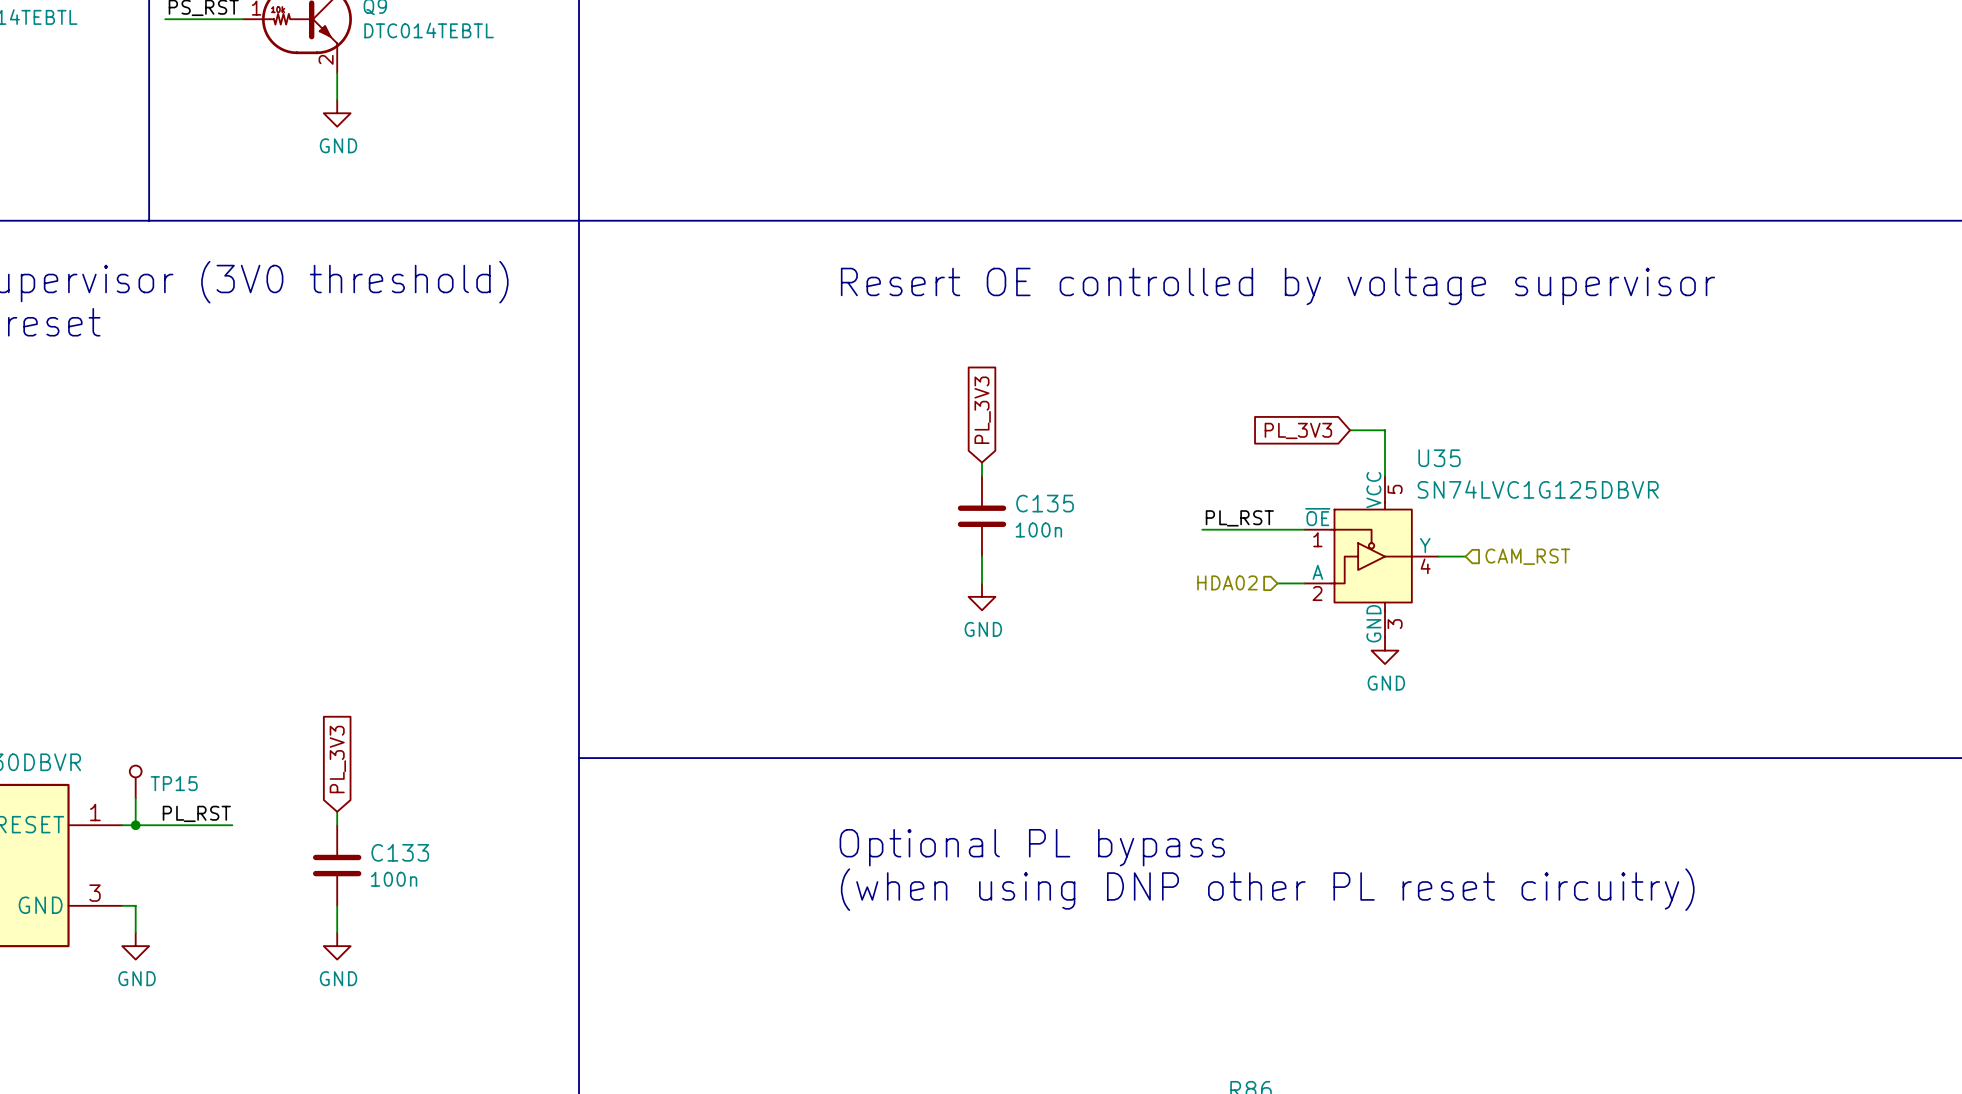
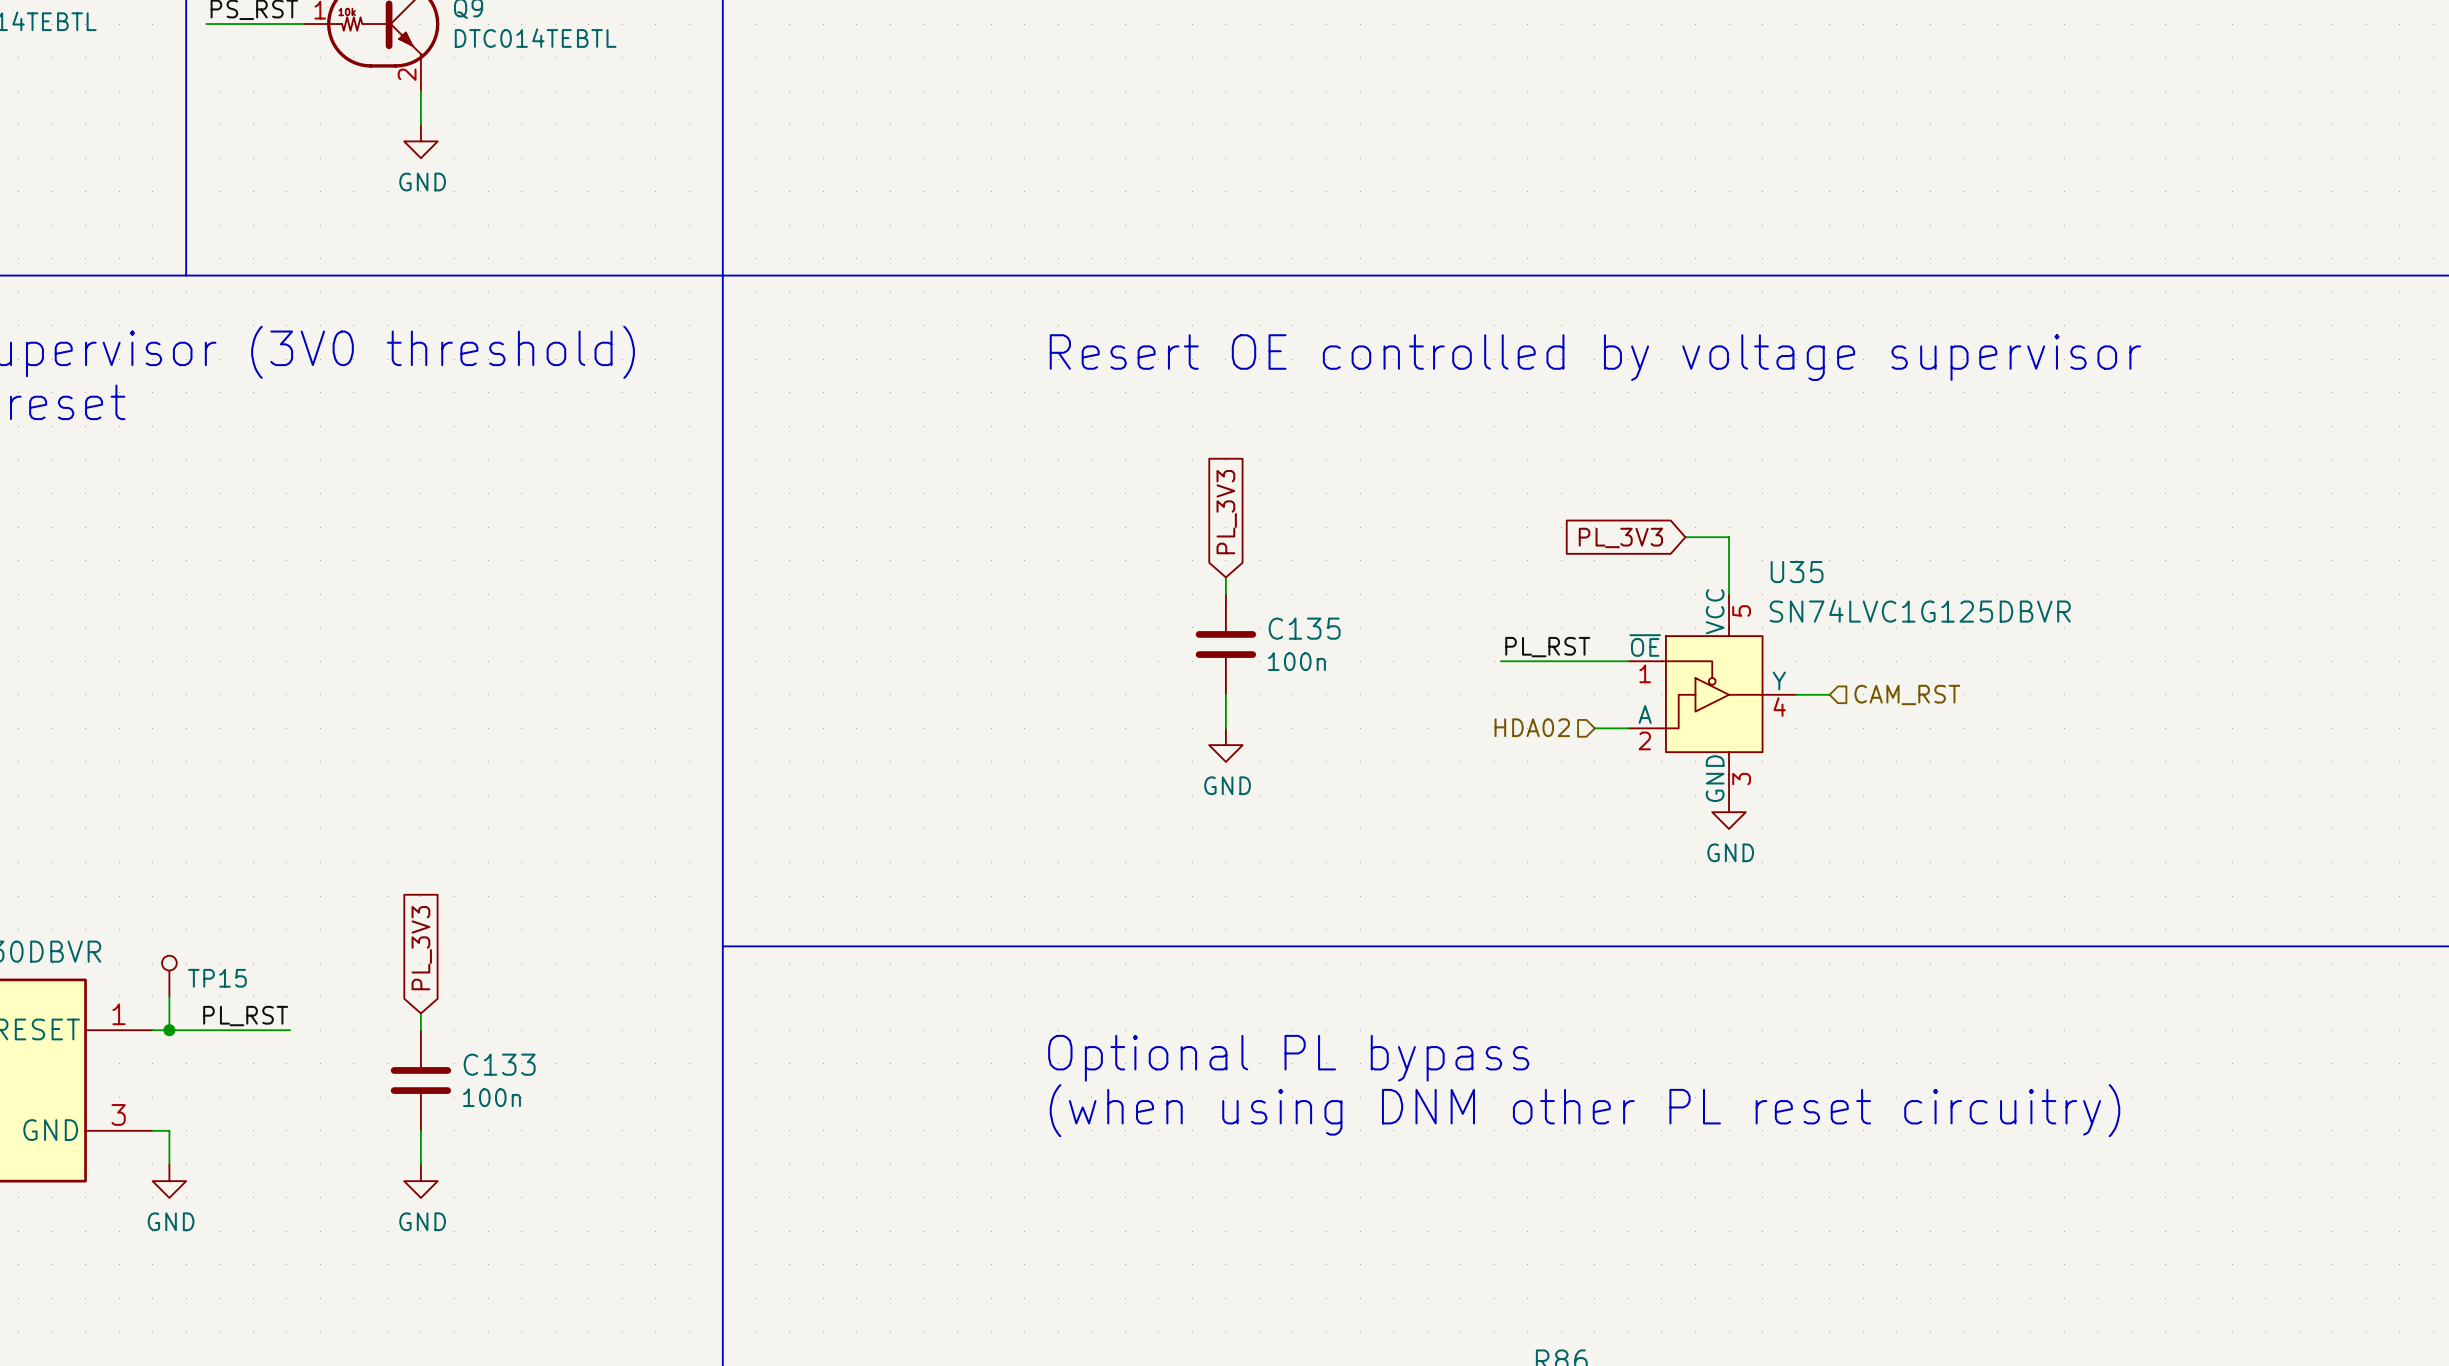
text: (when using DNP other PL reset circuitry) (1267, 889) -> (when using DNM other PL reset circuitry) (1584, 1110)

